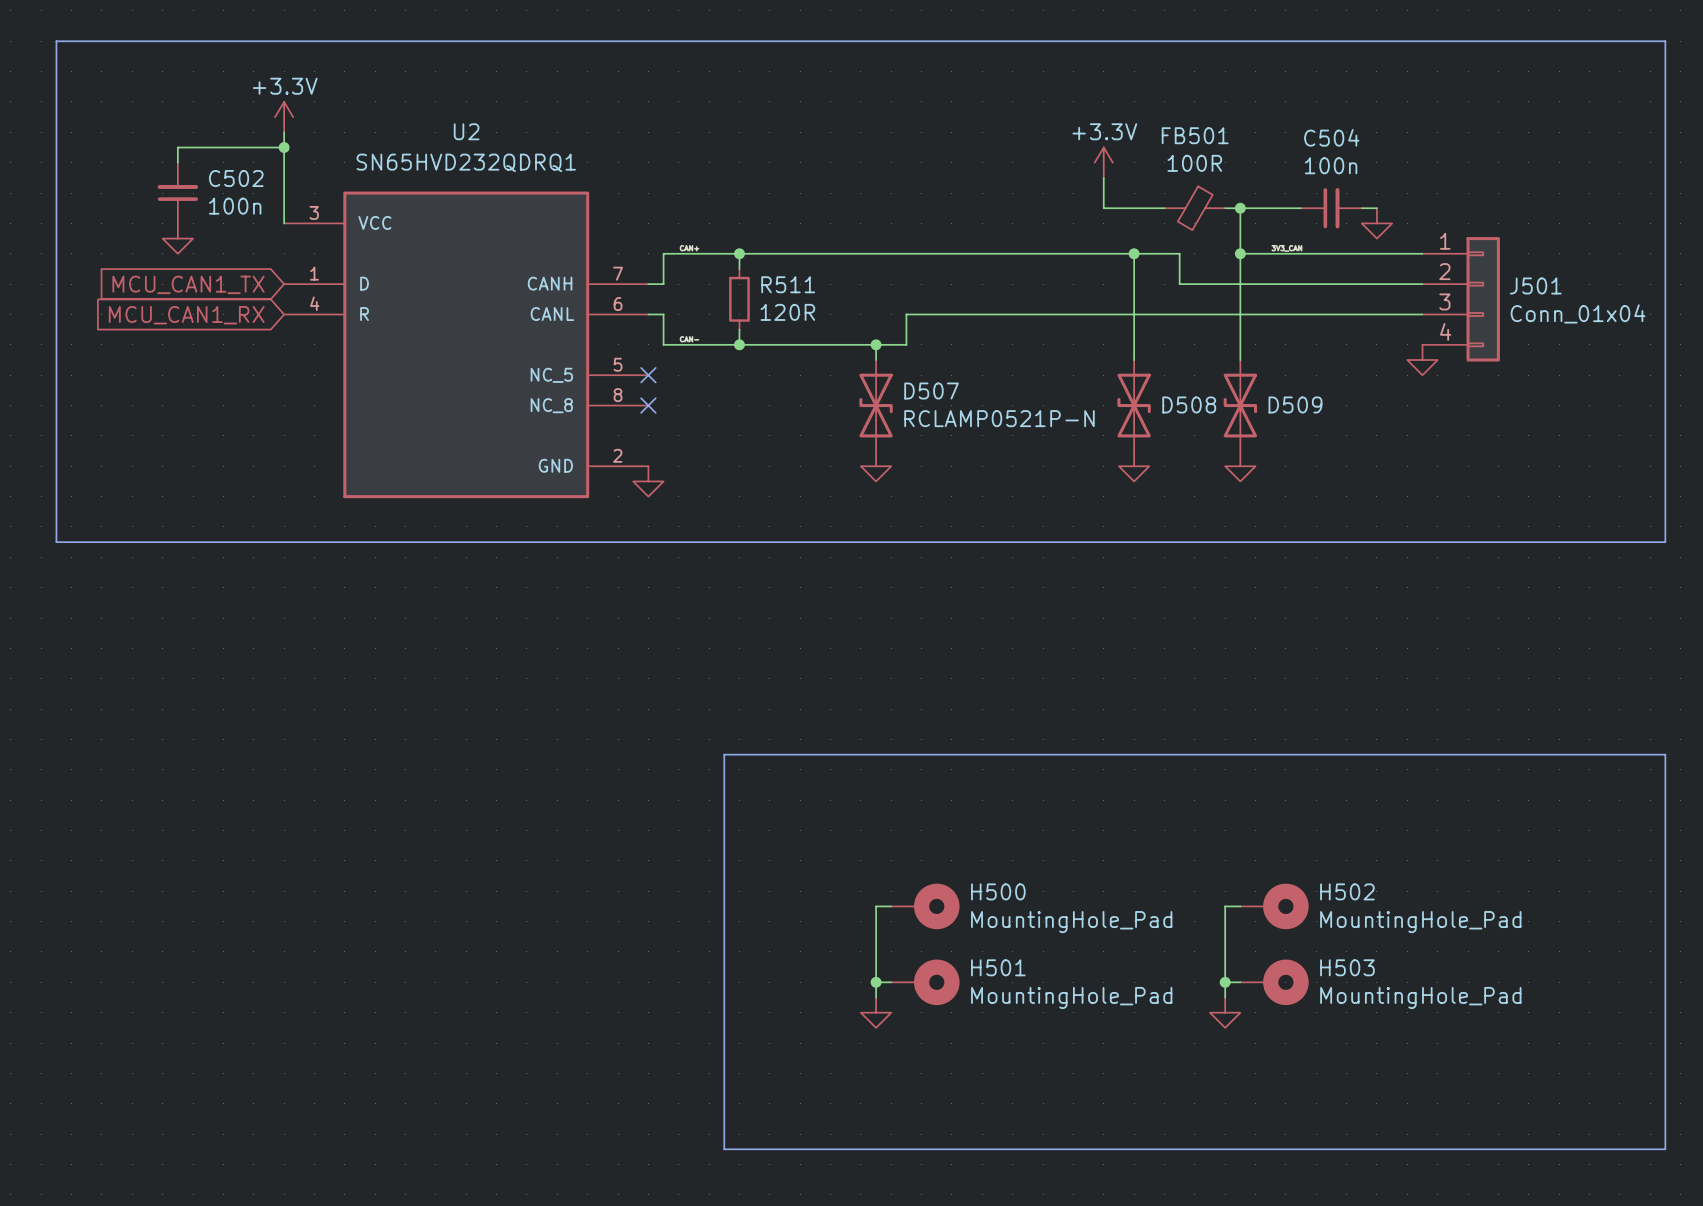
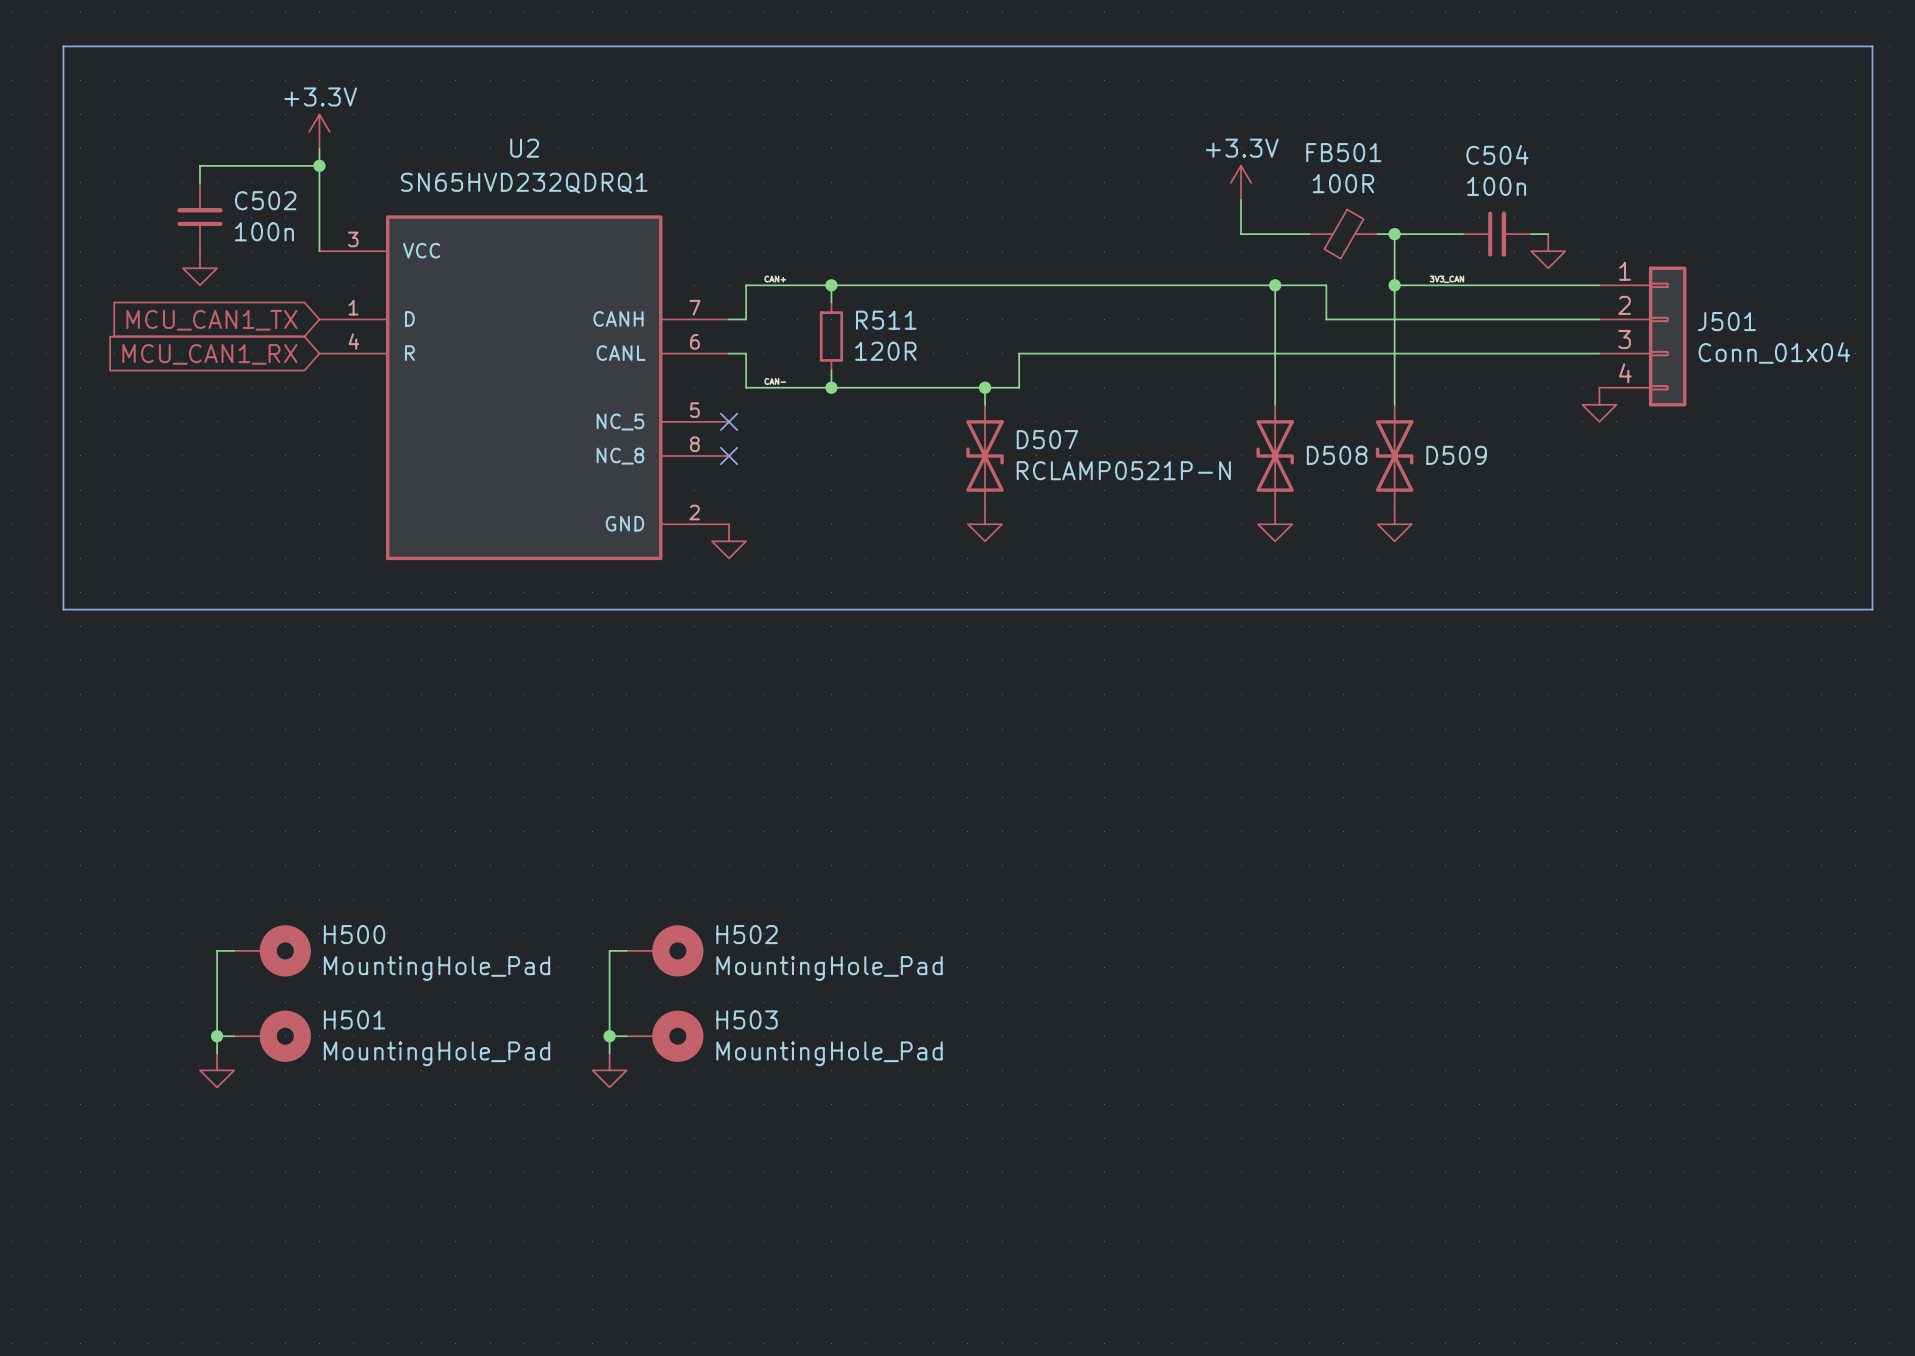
line: (724, 754) (1665, 754) (1665, 1149) (724, 1149) (724, 754) -> none
wire: none -> (234, 950) (217, 950) (217, 1053)
wire: none -> (626, 950) (609, 950) (609, 1053)
wire: (891, 906) (876, 906) (876, 997) -> none
H500 position: (925, 906) -> (272, 950)
wire: (1240, 906) (1225, 906) (1225, 997) -> none
H502 position: (1274, 906) -> (665, 950)
wire: none -> (217, 1036) (234, 1036)
junction: none -> (217, 1036)
wire: none -> (609, 1036) (626, 1036)
junction: none -> (609, 1036)
power symbol: none -> (217, 1070)
power symbol: none -> (609, 1070)
wire: (876, 982) (891, 982) -> none
junction: (876, 982) -> none
H501 position: (925, 982) -> (272, 1036)
wire: (1225, 982) (1240, 982) -> none
junction: (1225, 982) -> none
H503 position: (1274, 982) -> (665, 1036)
power symbol: (876, 1012) -> none
power symbol: (1225, 1012) -> none

